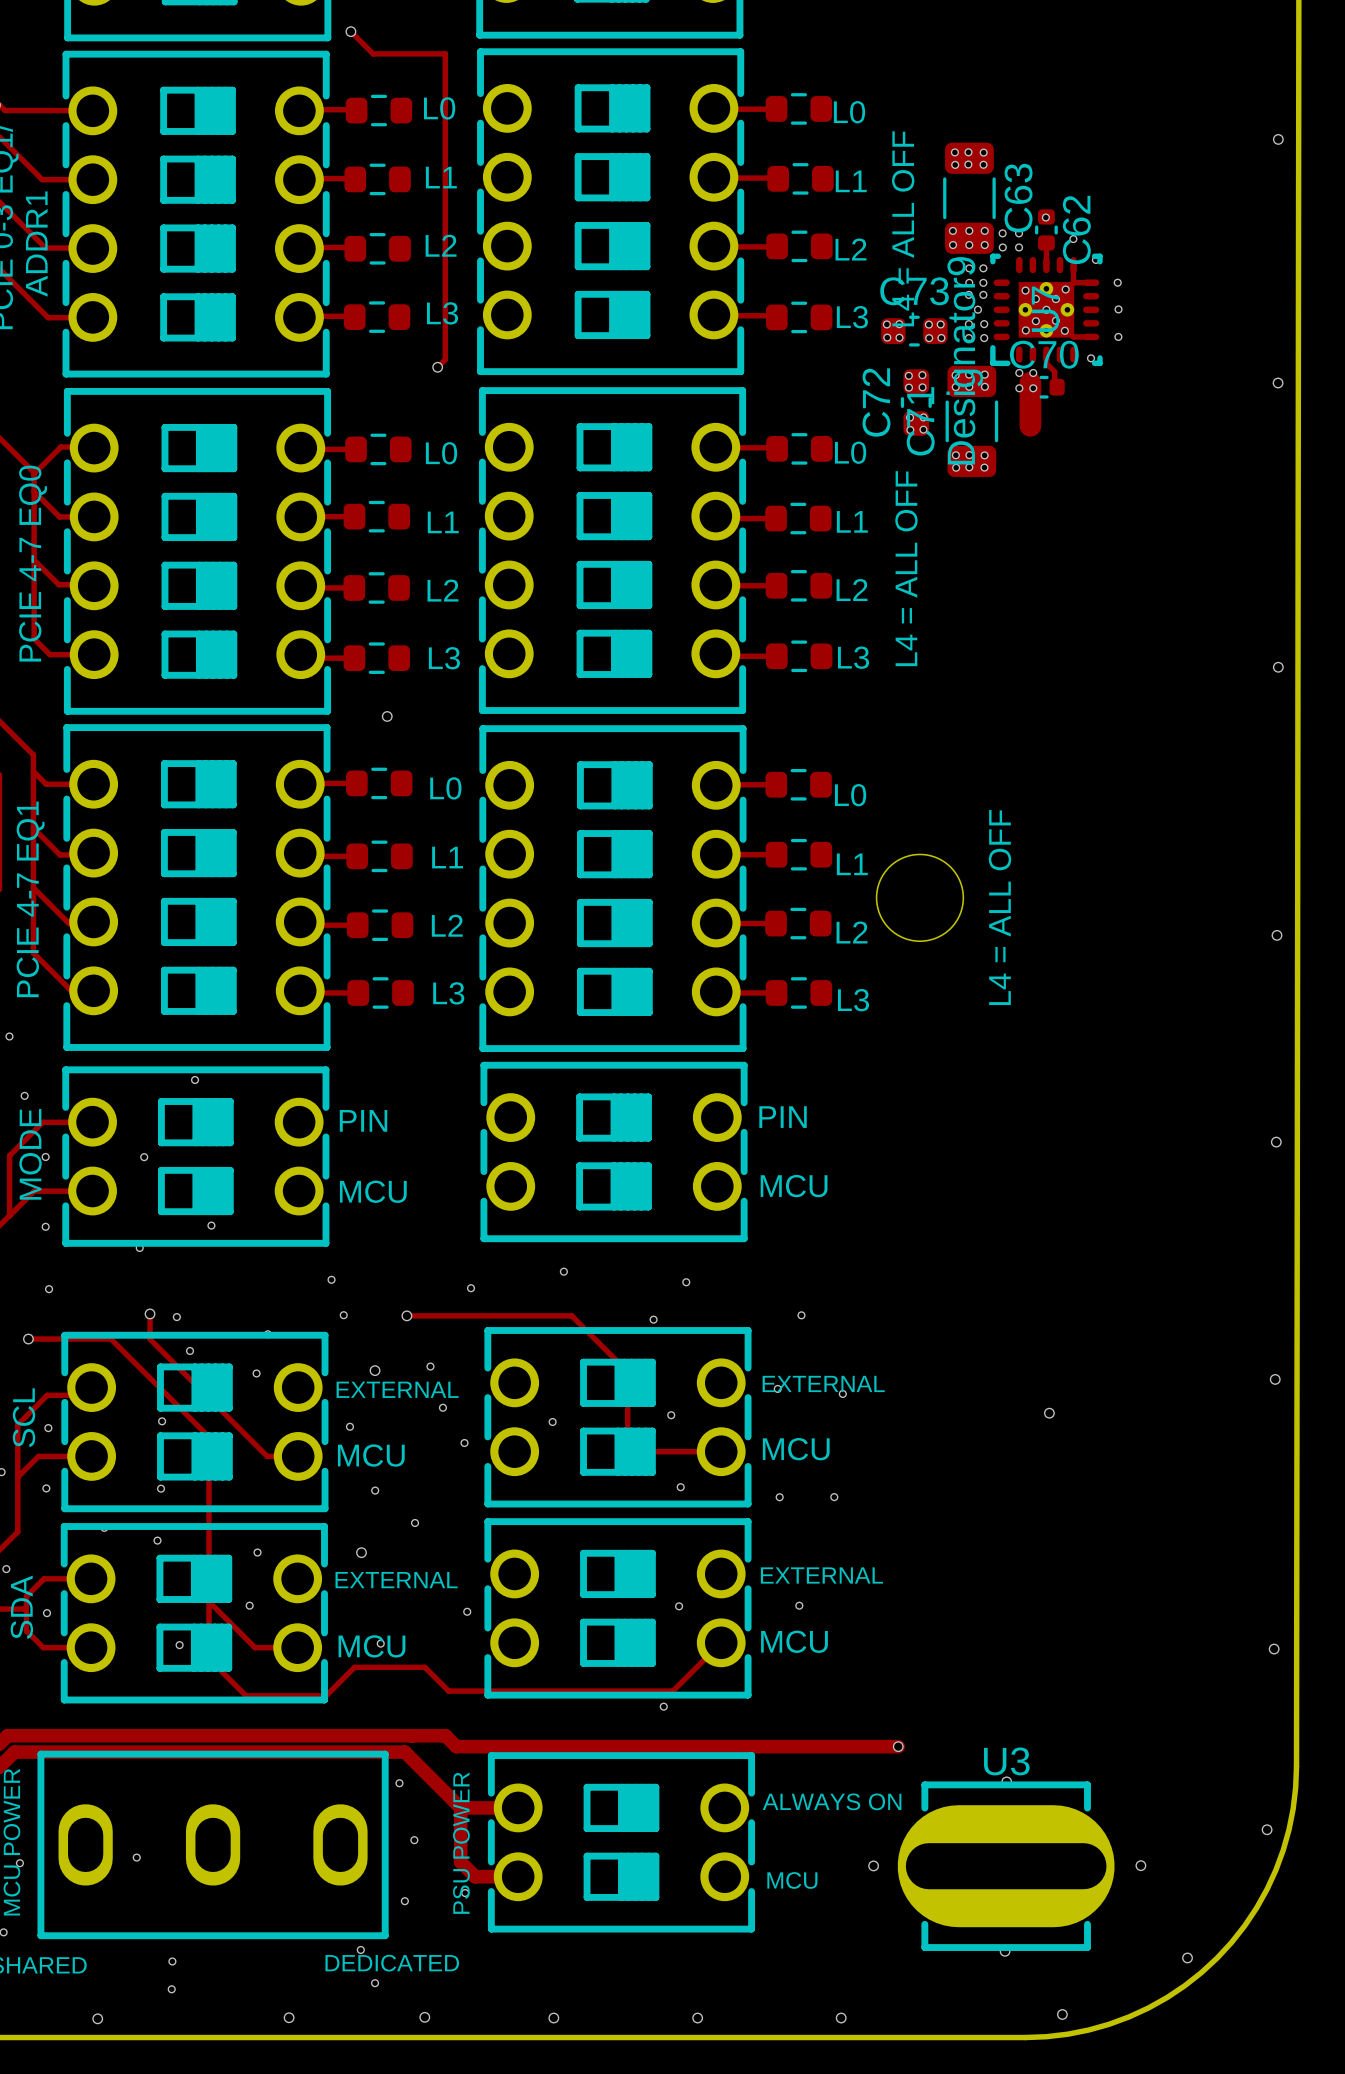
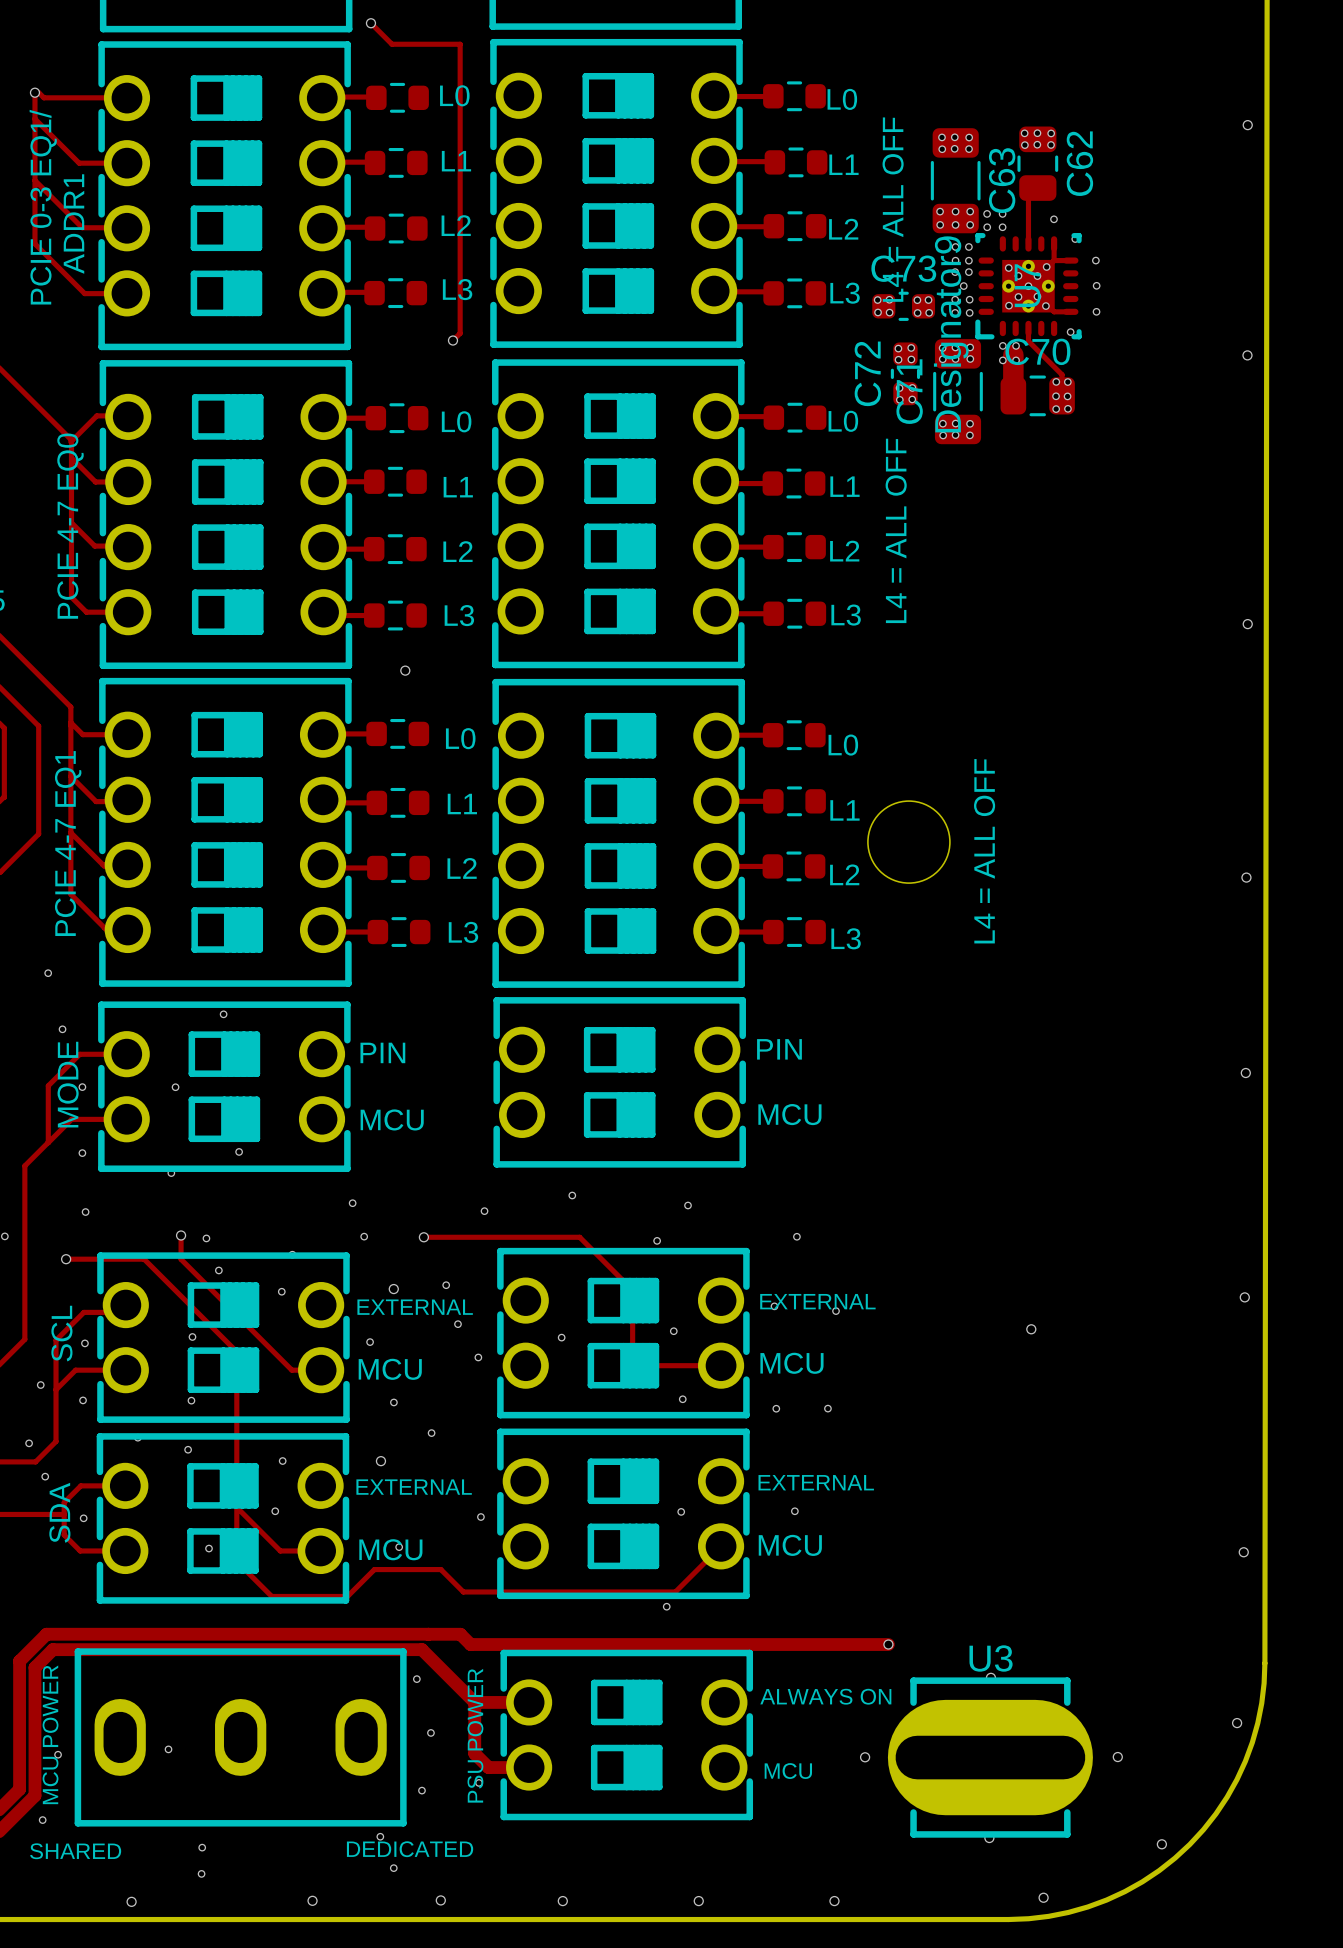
via: none -> (1037, 133)
via: none -> (1024, 133)
via: none -> (1051, 133)
via: none -> (1024, 145)
via: none -> (1037, 144)
via: none -> (1051, 144)
track: none -> (1037, 188) (1028, 197) (1028, 223)
C62 footprint: [1035, 209, 1058, 251] -> [1017, 126, 1059, 201]
via: (1045, 217) -> none
track: (1046, 363) (1054, 371) (1054, 384) (1057, 387) -> (1028, 336) (1028, 341) (1062, 374) (1062, 395)
C70 footprint: [1023, 375, 1065, 399] -> [1000, 375, 1075, 417]
via: none -> (1056, 381)
via: none -> (1067, 382)
via: none -> (1056, 396)
via: none -> (1067, 396)
via: none -> (1056, 409)
via: none -> (1067, 408)

